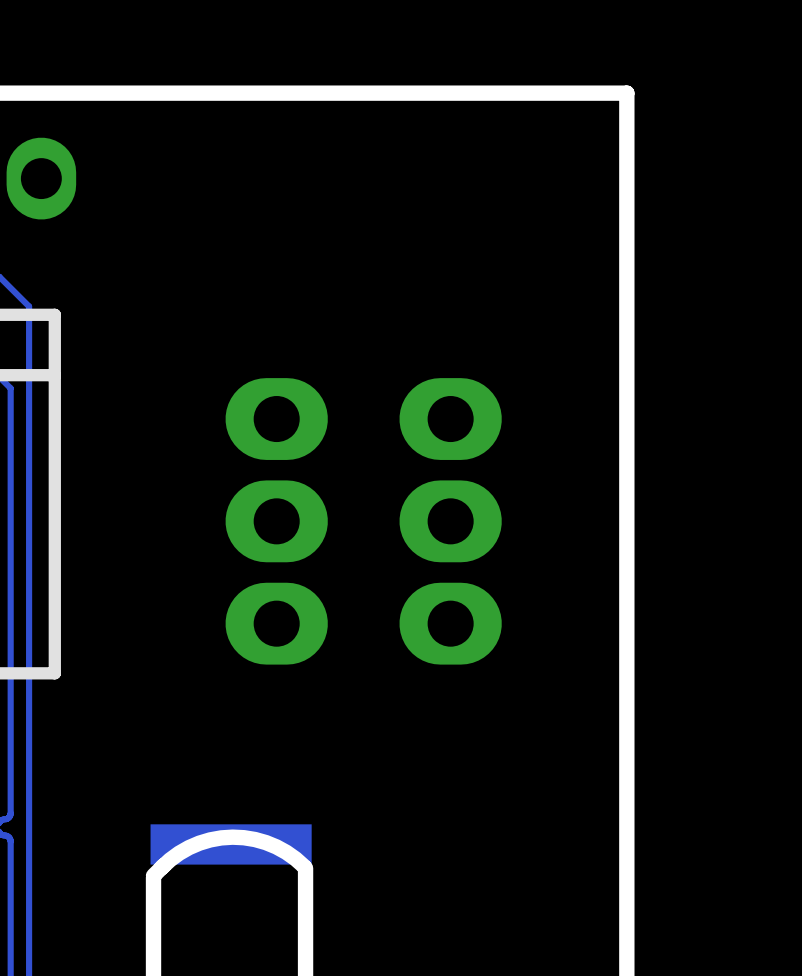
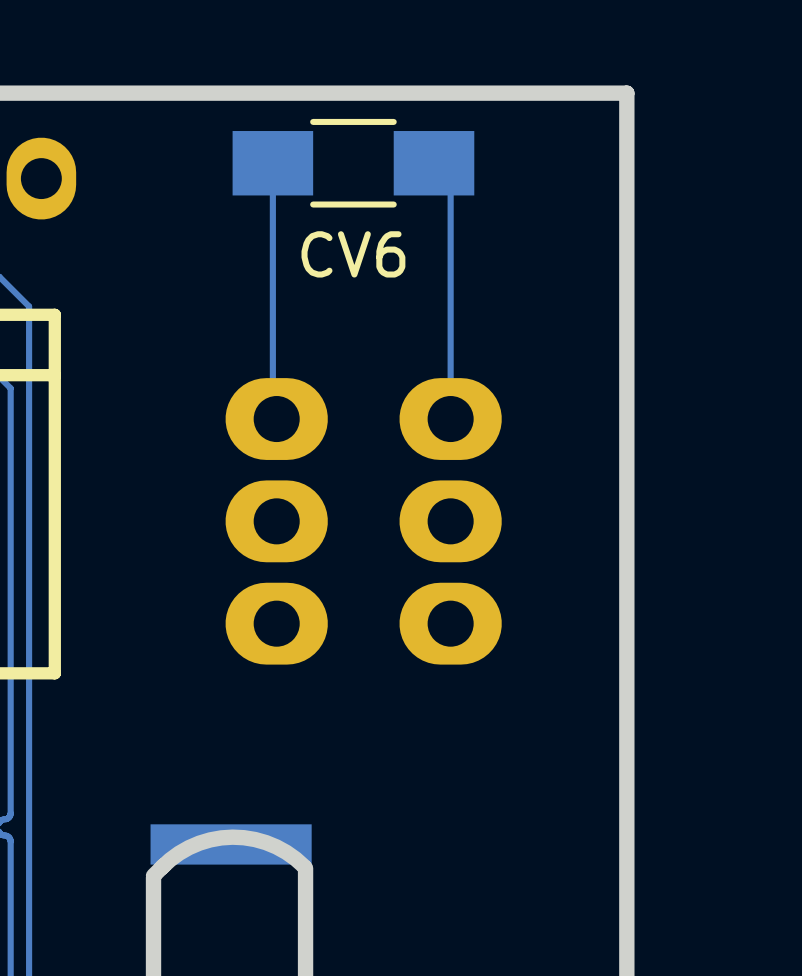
track: none -> (272, 163) (272, 422)
CV6: none -> (353, 163)
track: none -> (434, 163) (450, 179) (450, 419)

